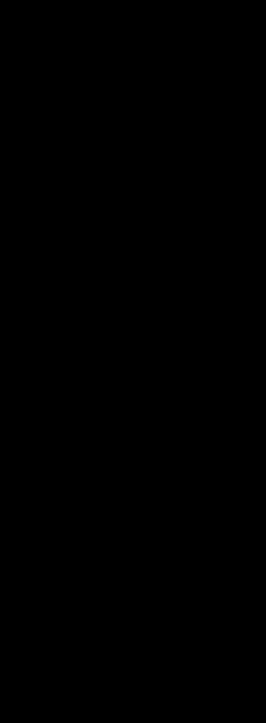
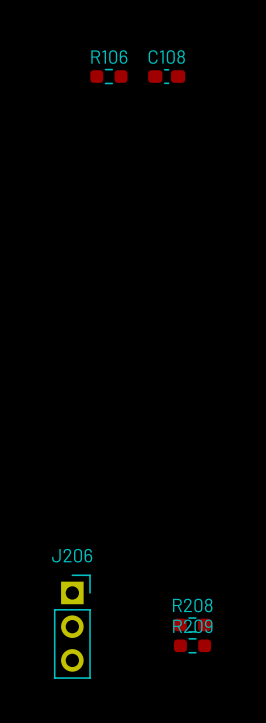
R106: none -> (108, 76)
C108: none -> (166, 76)
R208: none -> (192, 624)
J206: none -> (72, 626)
R209: none -> (192, 645)

